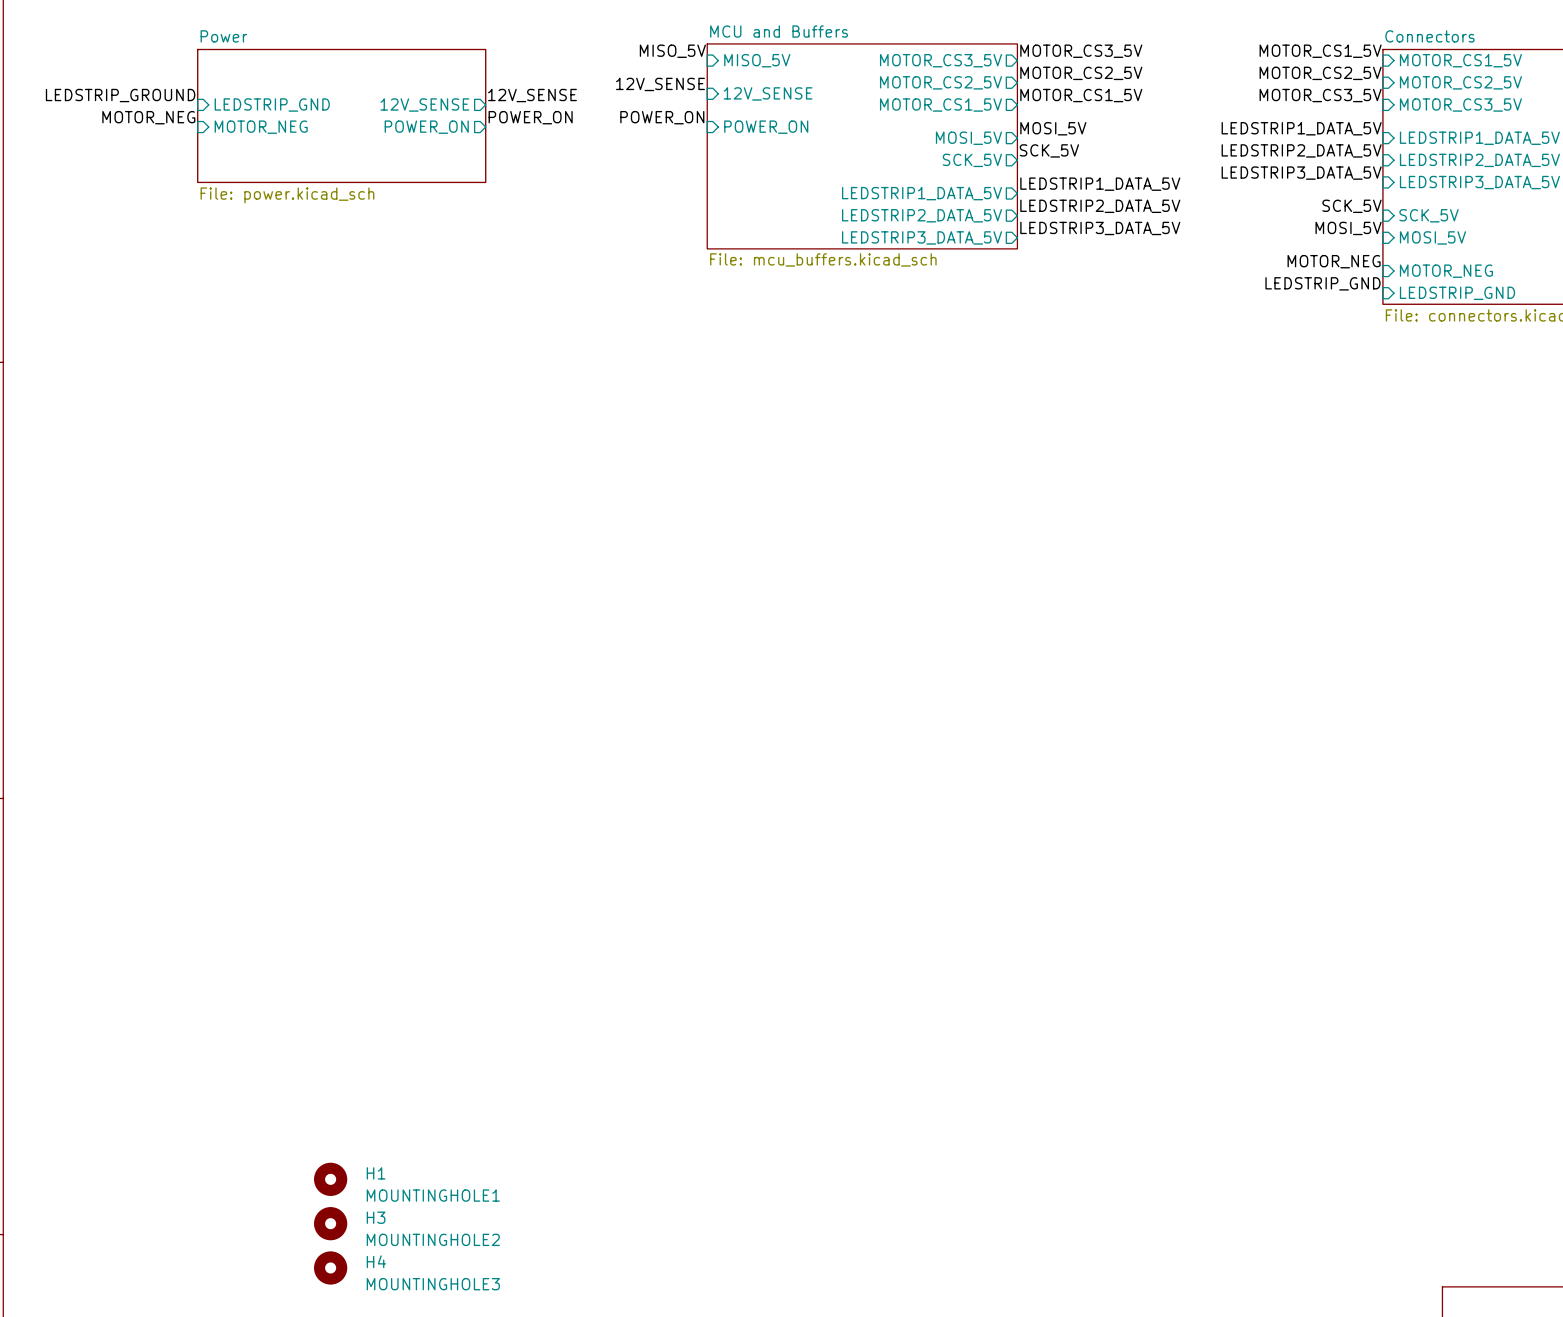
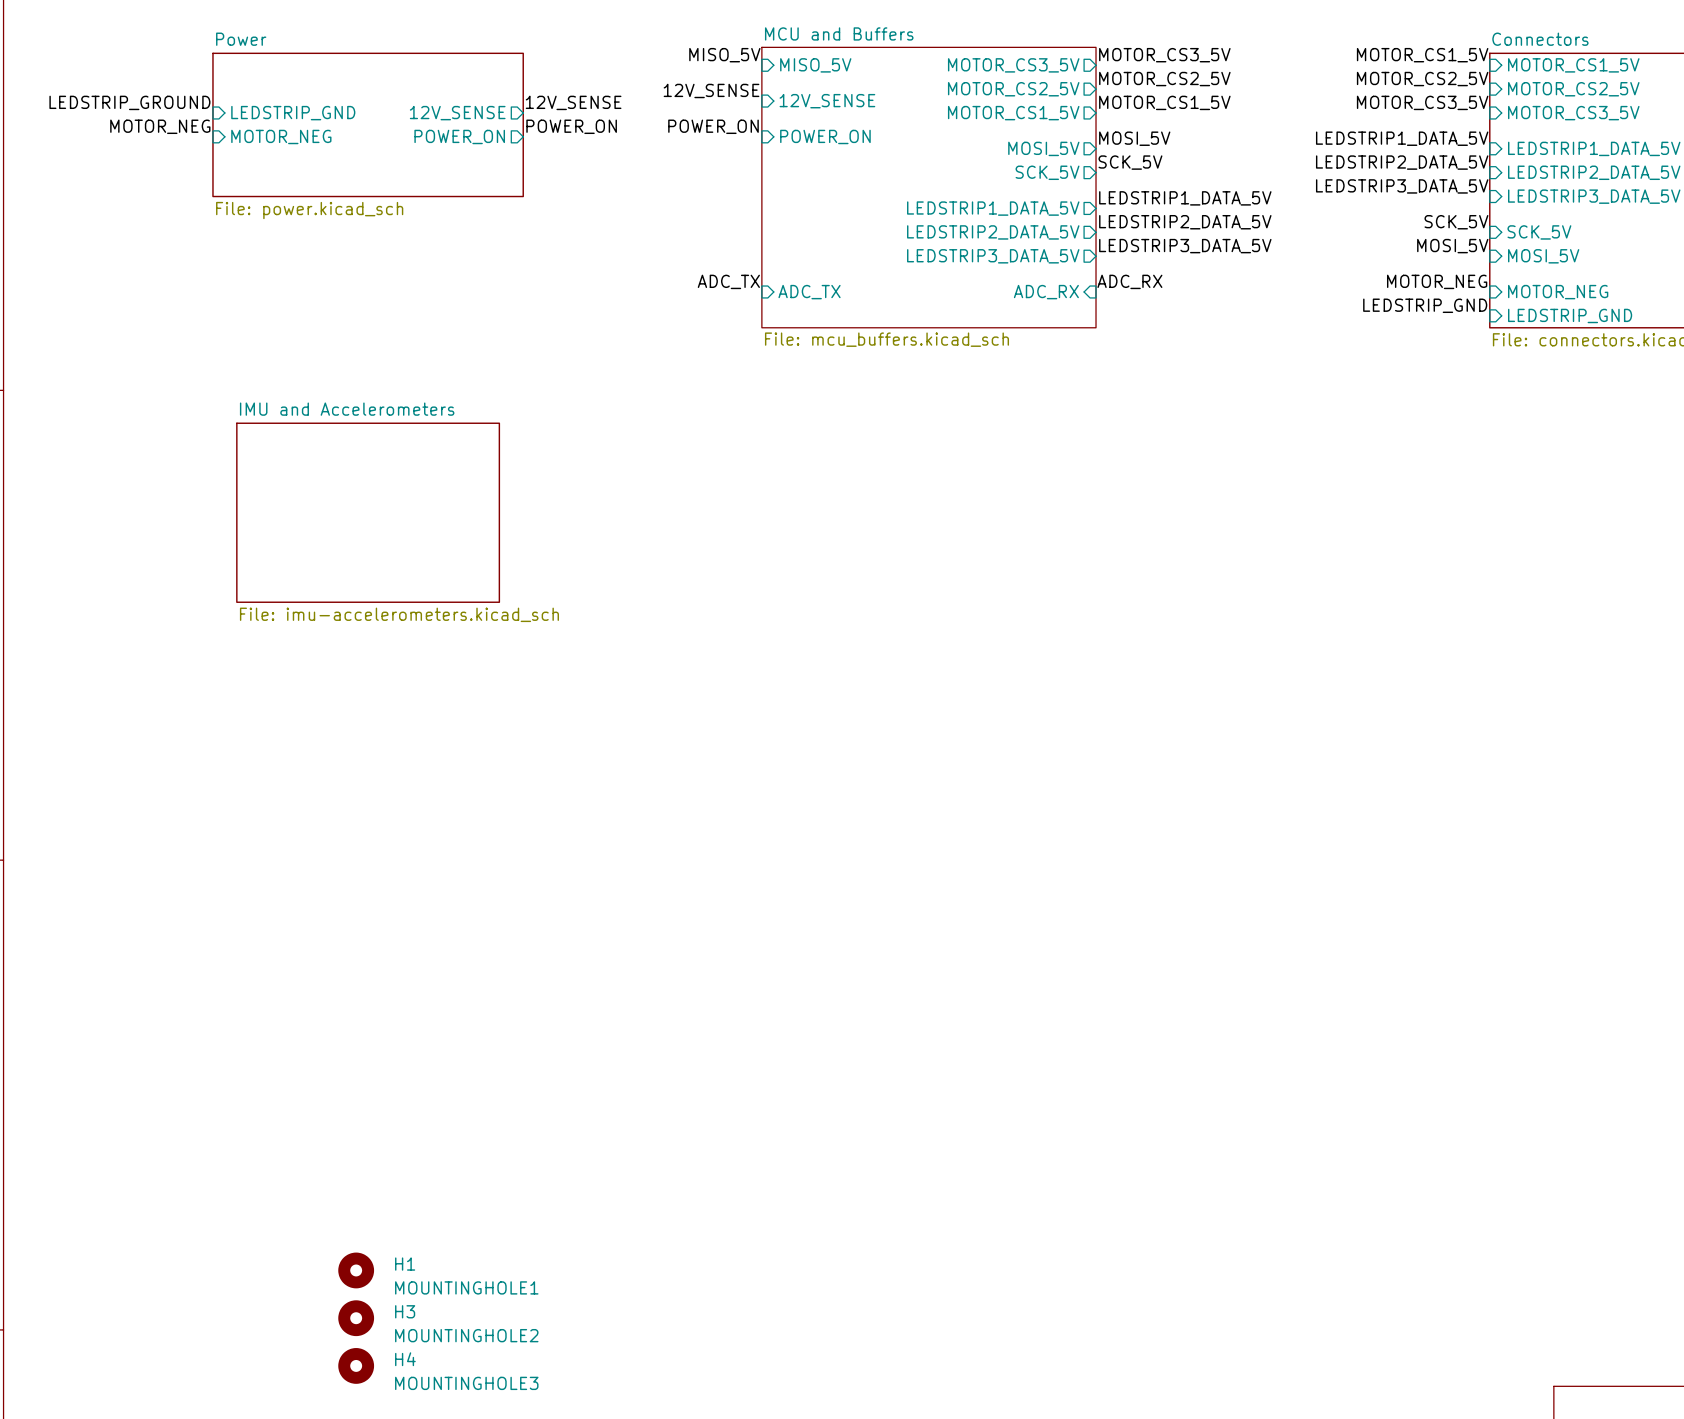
sheet MCU and Buffers: File: mcu_buffers.kicad_sch (862, 146) -> none
sheet MCU and Buffers: none -> File: mcu_buffers.kicad_sch (928, 187)
label: none -> ADC_TX (728, 281)
label: none -> ADC_RX (1129, 281)
sheet pin: none -> ADC_TX (809, 292)
sheet pin: none -> ADC_RX (1046, 292)
sheet IMU and Accelerometers: none -> File: imu-accelerometers.kicad_sch (368, 512)

